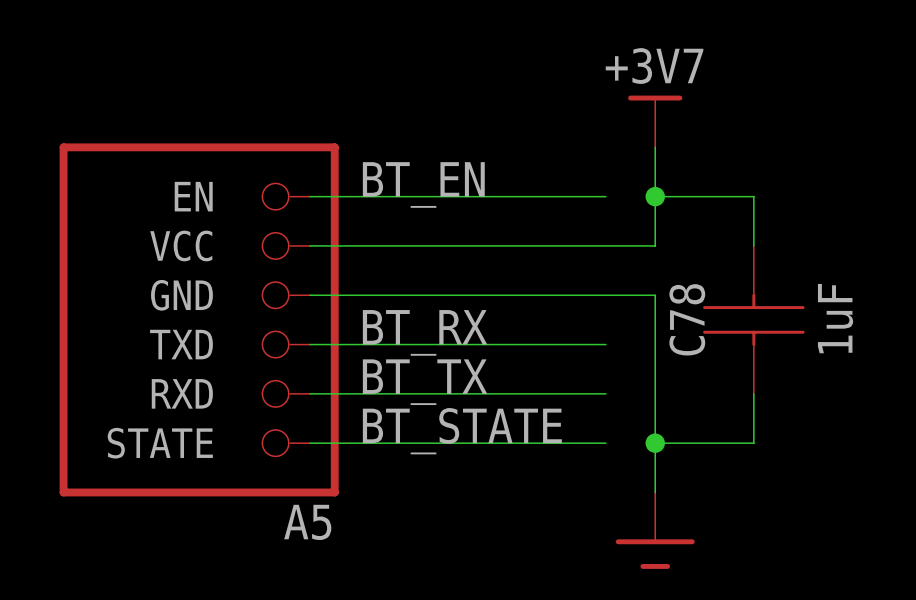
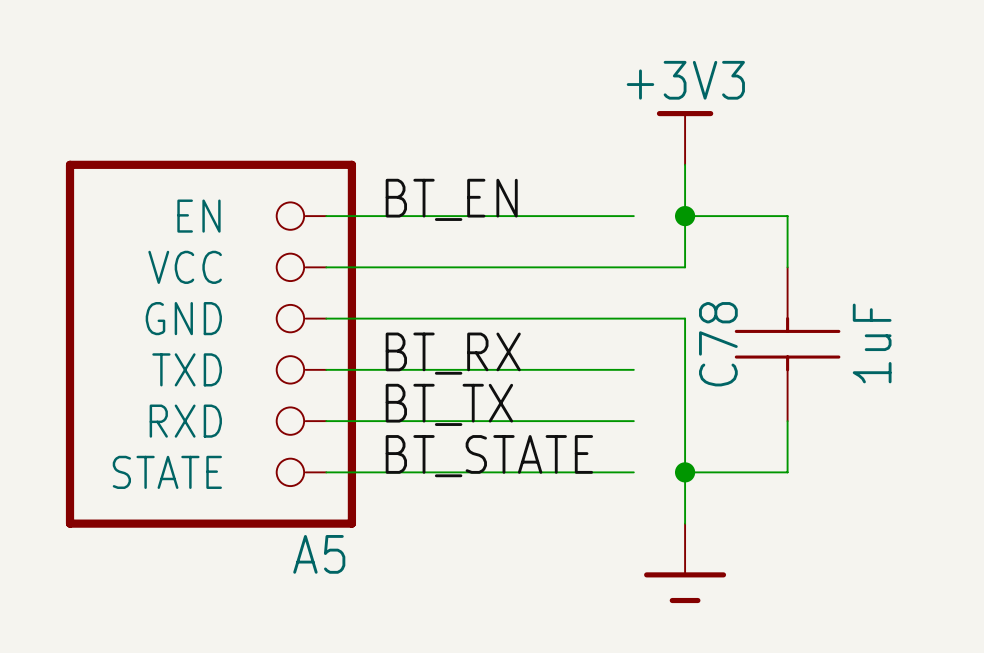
power symbol: +3V7 (655, 121) -> +3V3 (685, 137)

